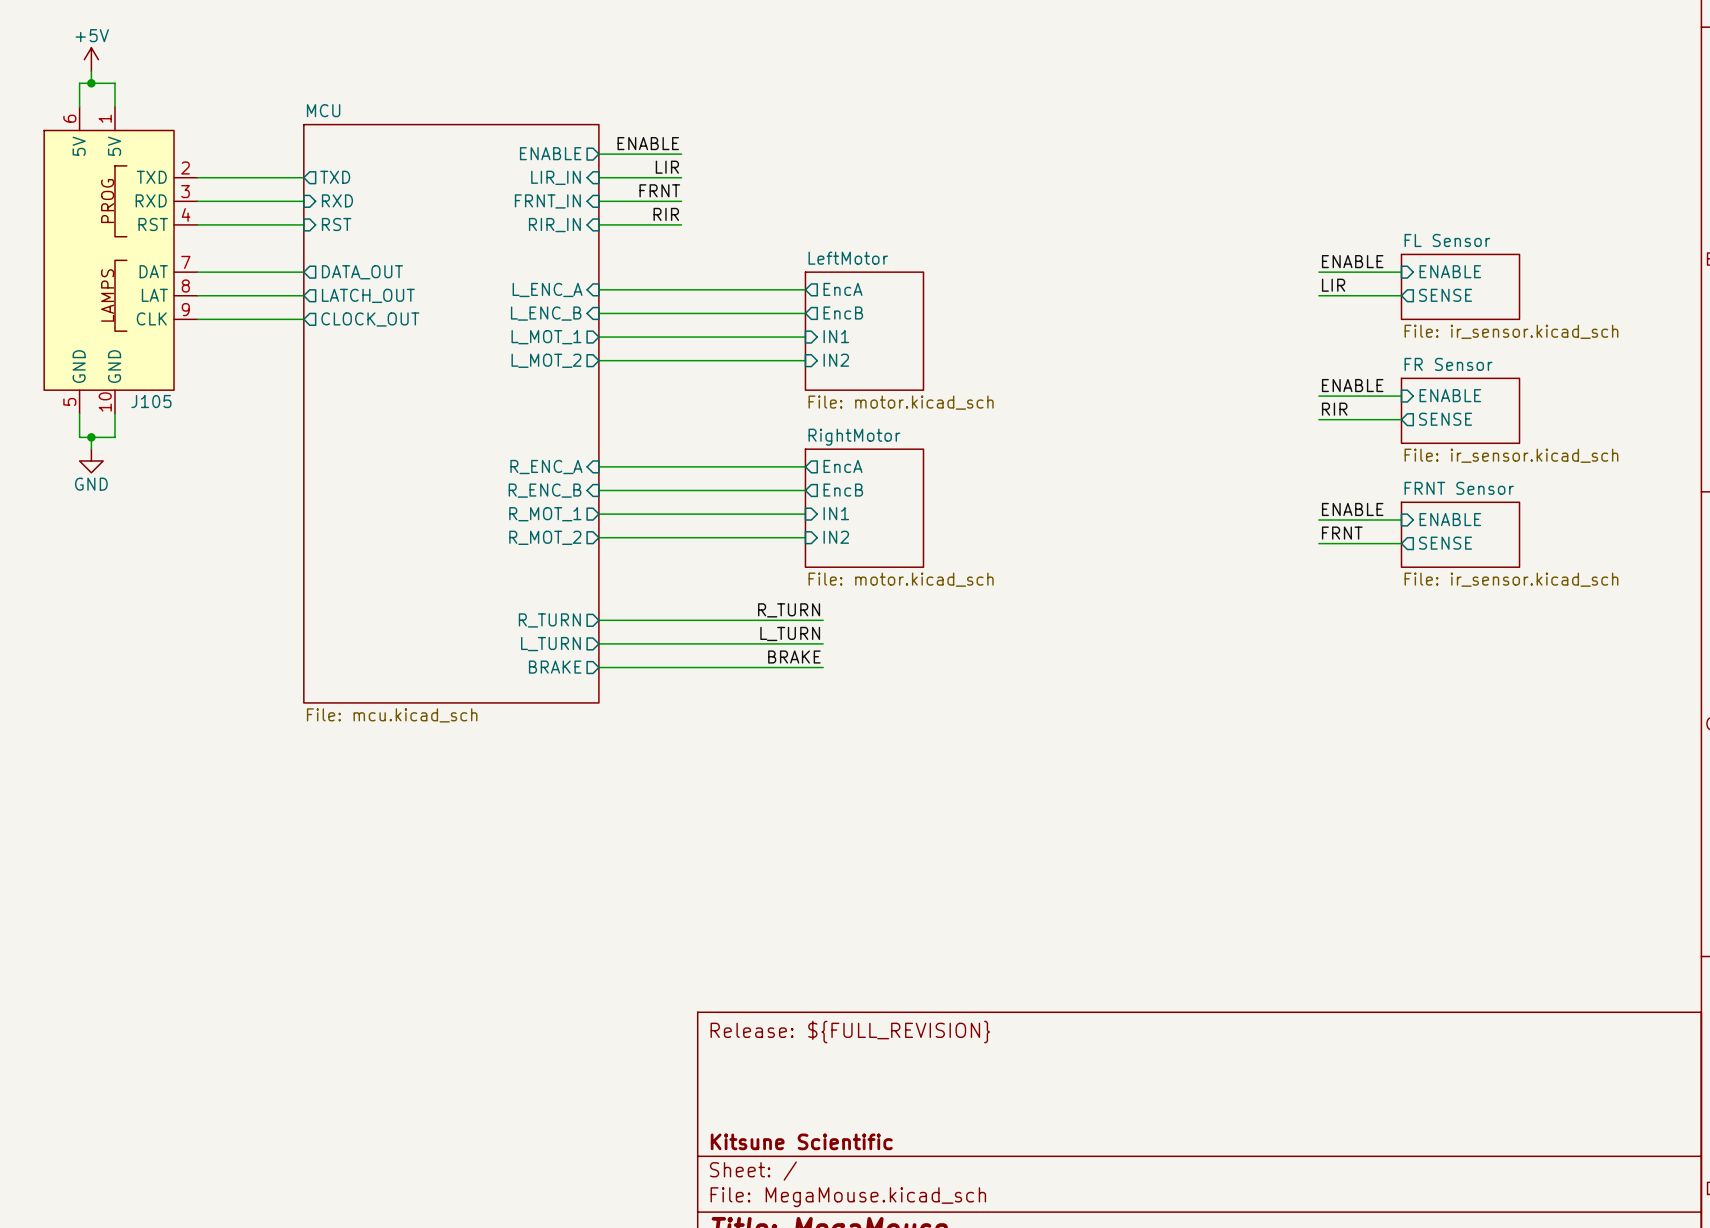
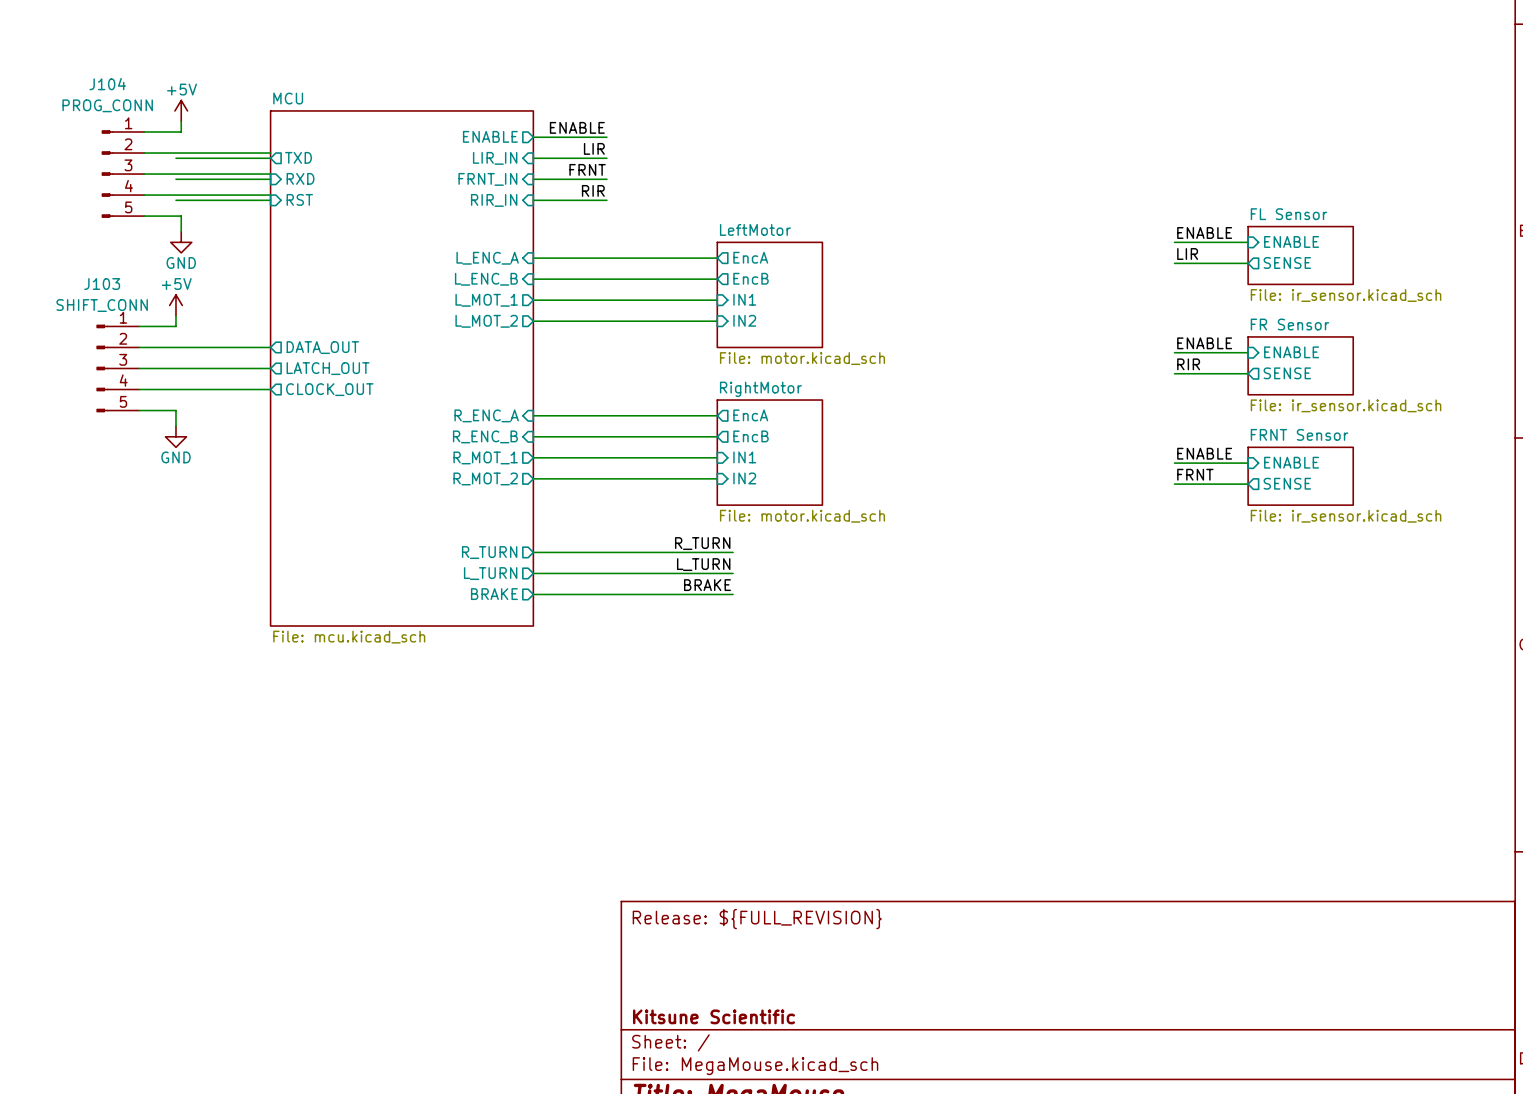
power symbol position: +5V (91, 59) -> +5V (181, 110)
wire: (91, 71) (91, 83) -> none
junction: (91, 83) -> none
wire: (79, 106) (79, 83) (114, 83) (114, 106) -> none
wire: none -> (181, 121) (181, 131) (144, 131)
wire: none -> (144, 153) (270, 153)
J104: none -> PROG_CONN (123, 174)
wire: none -> (144, 174) (270, 174)
wire: none -> (144, 195) (270, 195)
wire: none -> (144, 216) (181, 216) (181, 231)
J105: (120, 260) -> none
wire: (197, 272) (303, 272) -> none
power symbol: none -> GND (181, 242)
sheet pin position: DATA_OUT (362, 272) -> DATA_OUT (322, 347)
wire: (197, 295) (303, 295) -> none
sheet pin position: LATCH_OUT (368, 295) -> LATCH_OUT (328, 368)
wire: (197, 319) (303, 319) -> none
sheet pin position: CLOCK_OUT (370, 319) -> CLOCK_OUT (329, 389)
power symbol: none -> +5V (175, 305)
wire: none -> (175, 315) (175, 326) (139, 326)
wire: none -> (139, 347) (270, 347)
wire: (79, 413) (79, 437) (114, 437) (114, 413) -> none
J103: none -> SHIFT_CONN (117, 368)
wire: none -> (139, 368) (270, 368)
wire: (91, 437) (91, 449) -> none
junction: (91, 437) -> none
wire: none -> (139, 389) (270, 389)
power symbol: GND (91, 460) -> none
wire: none -> (139, 410) (175, 410) (175, 426)
power symbol: none -> GND (175, 436)

